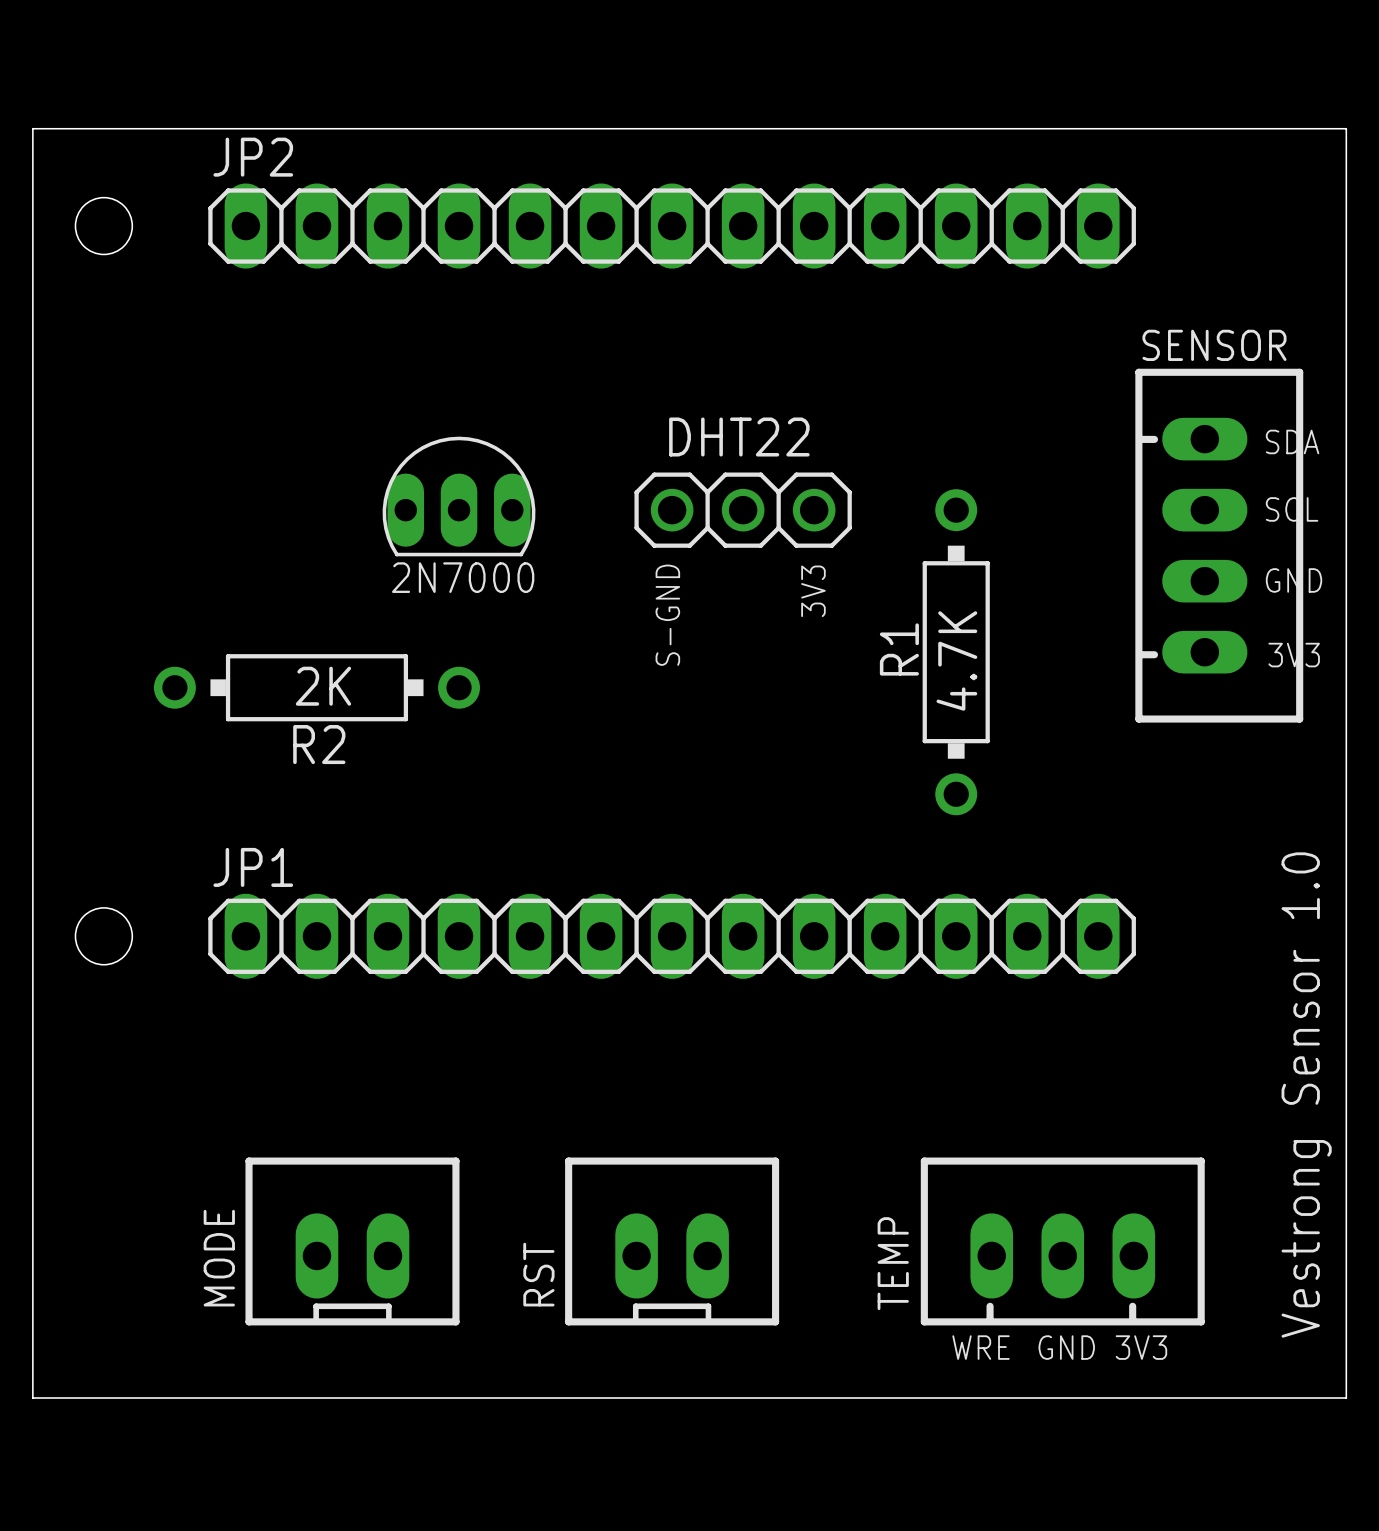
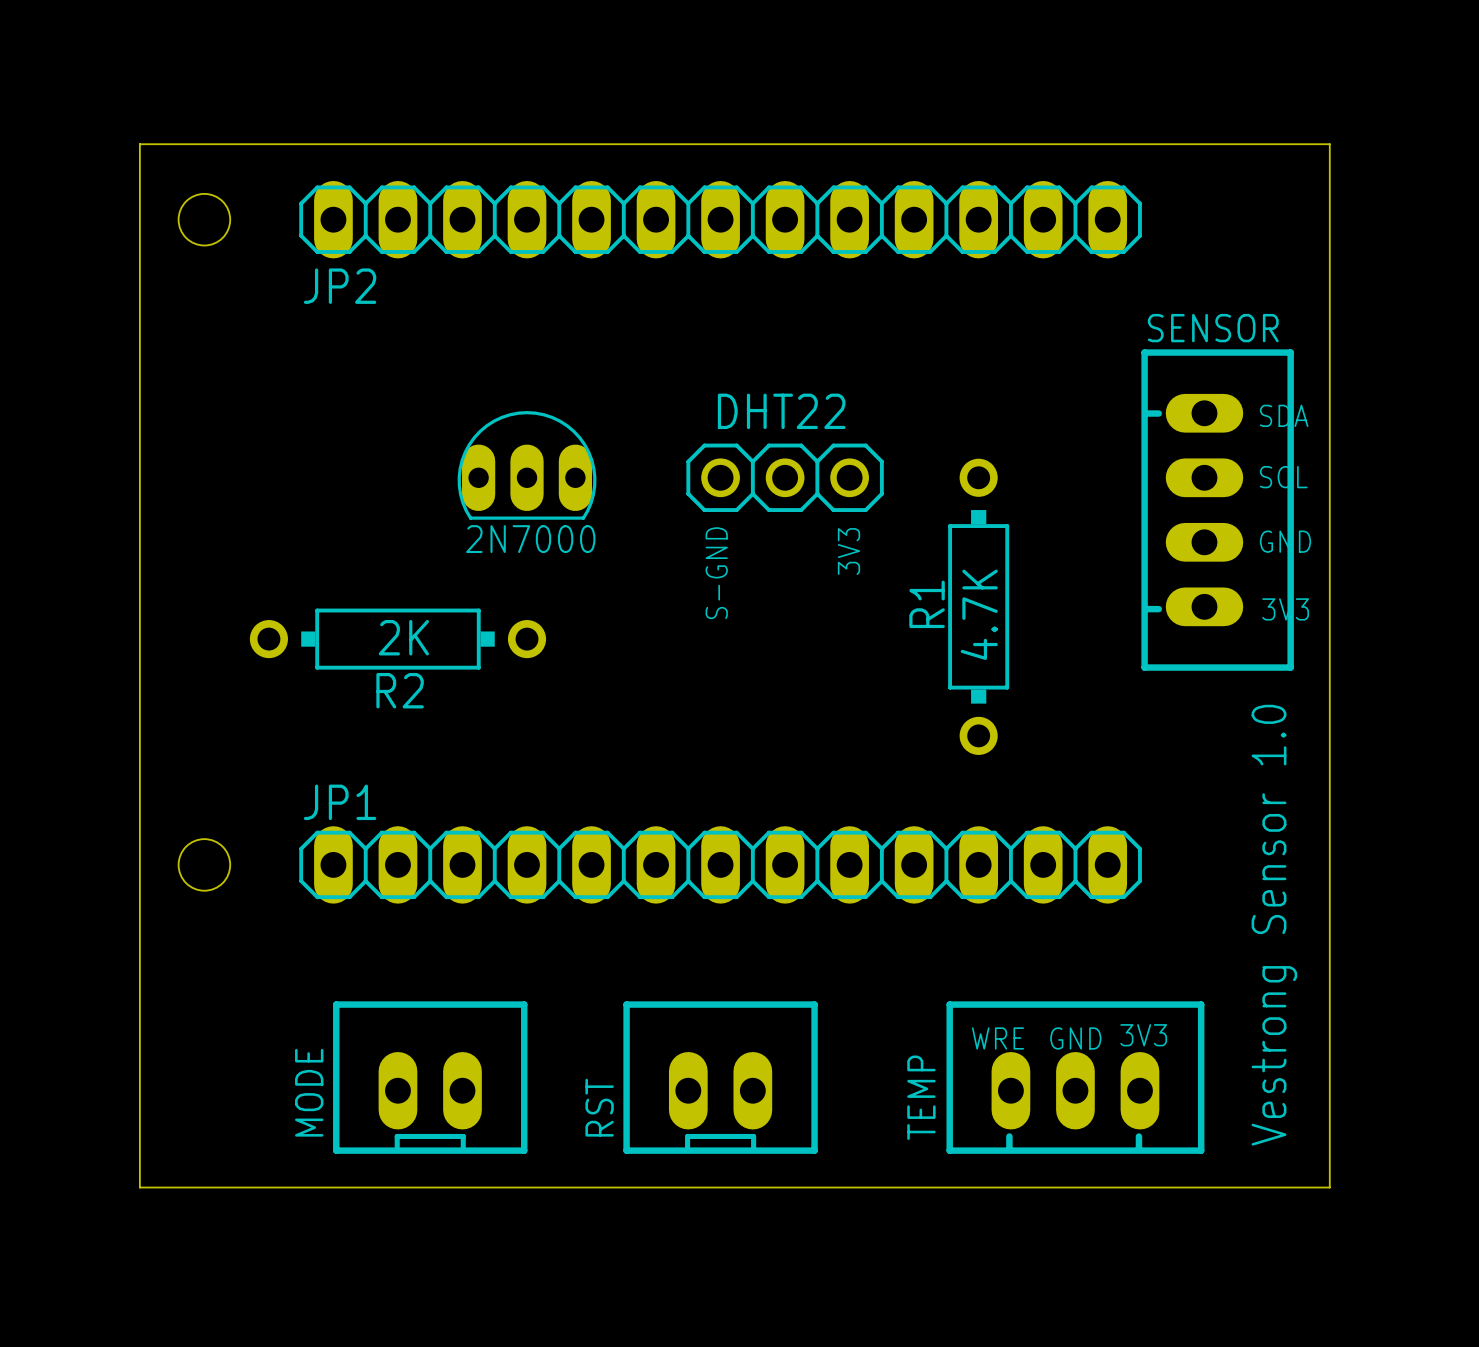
board edge: (32, 142) (32, 128) (1346, 128) (1346, 1398) (32, 1398) (32, 1291) -> (139, 144) (1329, 144) (1329, 1187) (139, 1187)
JP2 name position: JP2 (253, 157) -> JP2 (340, 286)
text position: Vestrong Sensor 1.0 (1306, 1095) -> Vestrong Sensor 1.0 (1274, 925)
MODE position: (352, 1241) -> (430, 1077)
RST position: (672, 1241) -> (720, 1077)
TEMP position: (1062, 1241) -> (1075, 1077)
text position: WRE (981, 1347) -> WRE (997, 1038)
text position: GND (1066, 1347) -> GND (1075, 1038)
text position: 3V3 (1141, 1347) -> 3V3 (1143, 1035)

